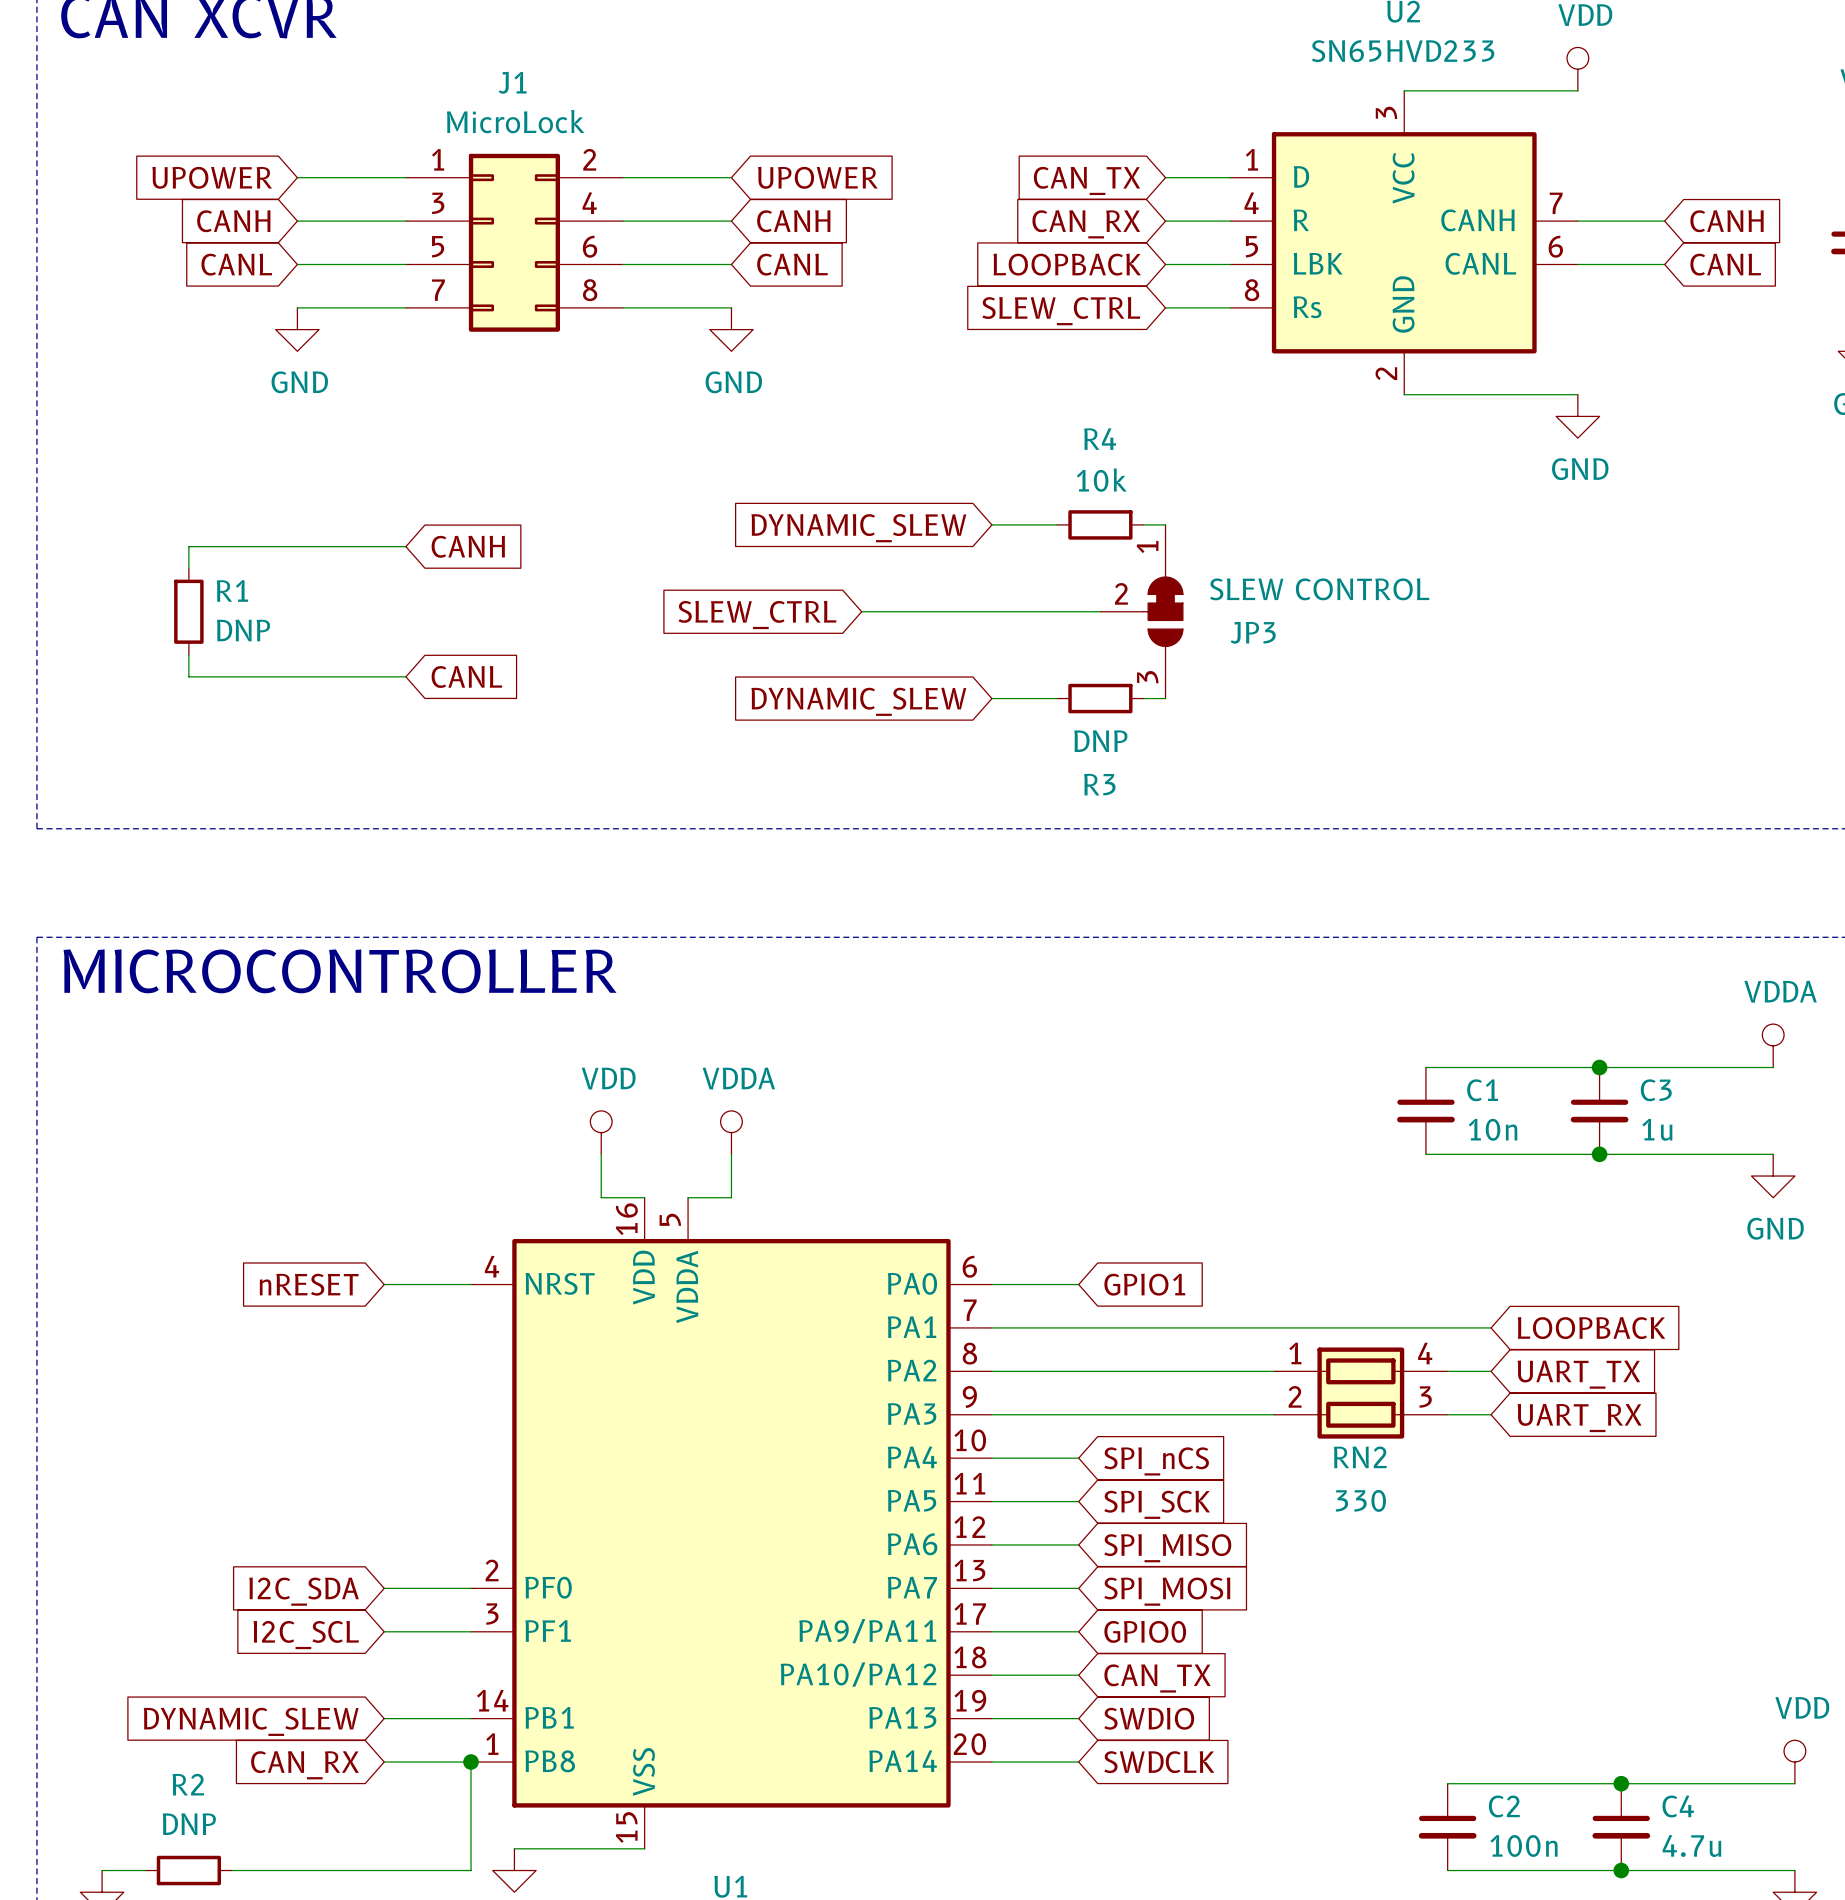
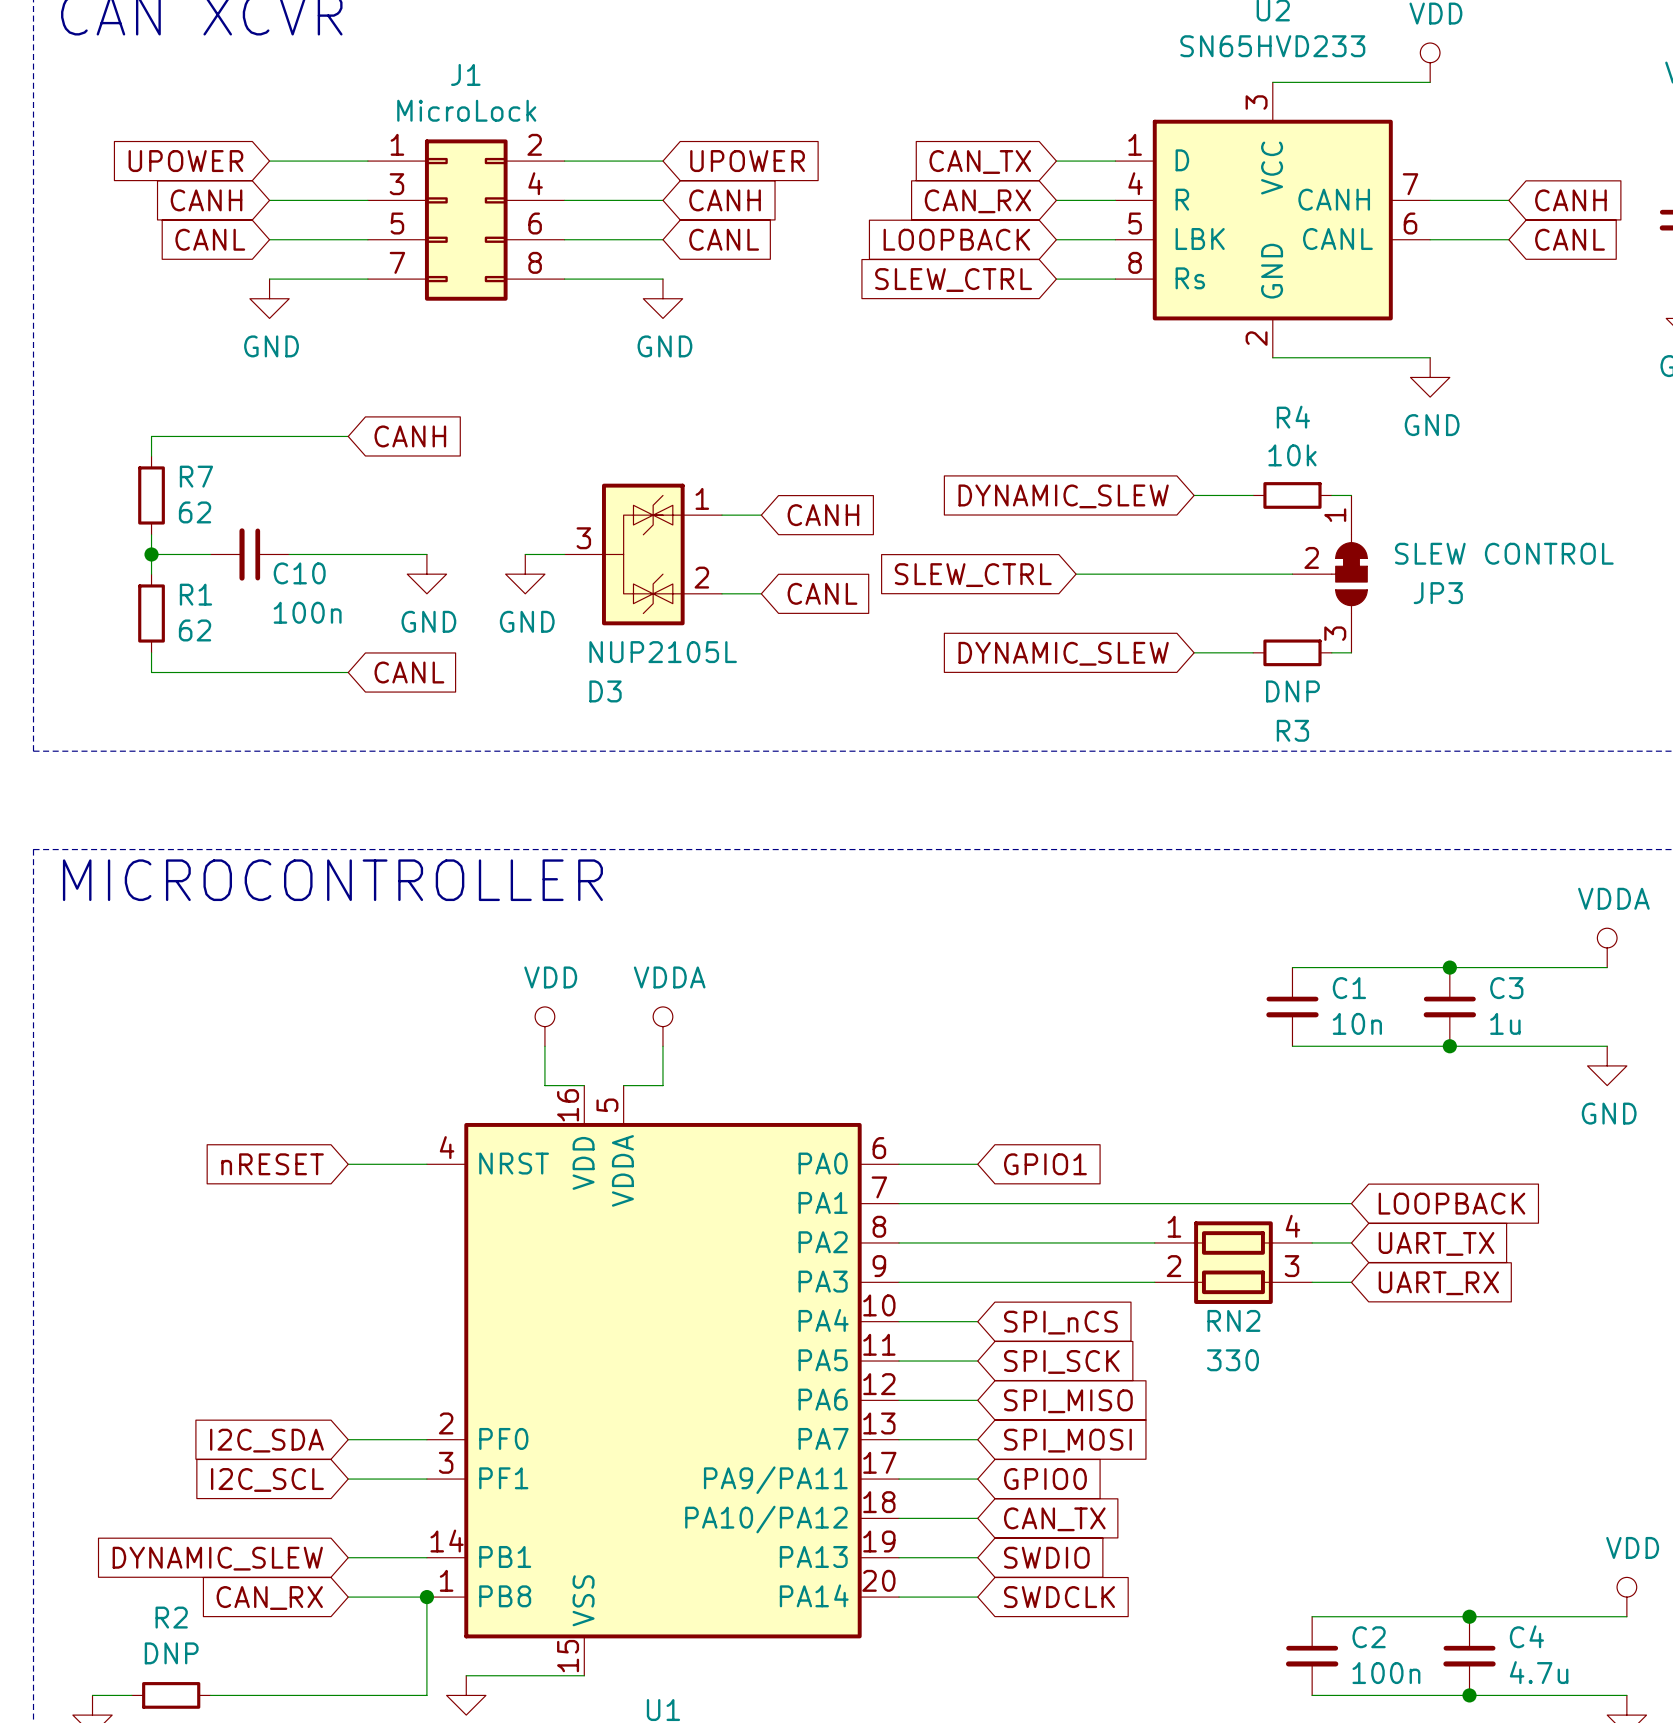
wire: (991, 524) (1057, 524) -> (1194, 495) (1253, 495)
R4 position: (1100, 524) -> (1292, 495)
wire: (1143, 524) (1165, 524) -> (1331, 495) (1351, 495)
global label position: DYNAMIC_SLEW (858, 528) -> DYNAMIC_SLEW (1063, 496)
R7: none -> 62 (151, 495)
wire: (405, 546) (188, 546) (188, 568) -> (348, 436) (151, 436) (151, 456)
global label position: CANH (468, 546) -> CANH (410, 436)
wire: none -> (722, 515) (761, 515)
global label: none -> CANH (823, 515)
wire: none -> (151, 534) (151, 574)
wire: none -> (151, 554) (210, 554)
junction: none -> (151, 554)
R1 position: (188, 611) -> (151, 613)
C10: none -> 100n (249, 554)
wire: none -> (289, 554) (426, 554)
wire: none -> (525, 554) (564, 554)
D3: none -> NUP2105L (643, 554)
wire: (861, 611) (1100, 611) -> (1076, 574) (1292, 574)
JP3 position: (1141, 611) -> (1329, 574)
global label position: SLEW_CTRL (757, 614) -> SLEW_CTRL (973, 575)
R1 value: DNP (243, 630) -> 62 (195, 630)
power symbol: none -> GND (426, 574)
power symbol: none -> GND (525, 574)
wire: (188, 655) (188, 676) (405, 676) -> (151, 652) (151, 672) (348, 672)
wire: none -> (722, 593) (761, 593)
global label: none -> CANL (822, 593)
global label position: CANL (466, 676) -> CANL (409, 672)
wire: (991, 698) (1057, 698) -> (1194, 652) (1253, 652)
R3 position: (1100, 698) -> (1292, 652)
wire: (1143, 698) (1165, 698) -> (1331, 652) (1351, 652)
global label position: DYNAMIC_SLEW (858, 701) -> DYNAMIC_SLEW (1063, 653)

